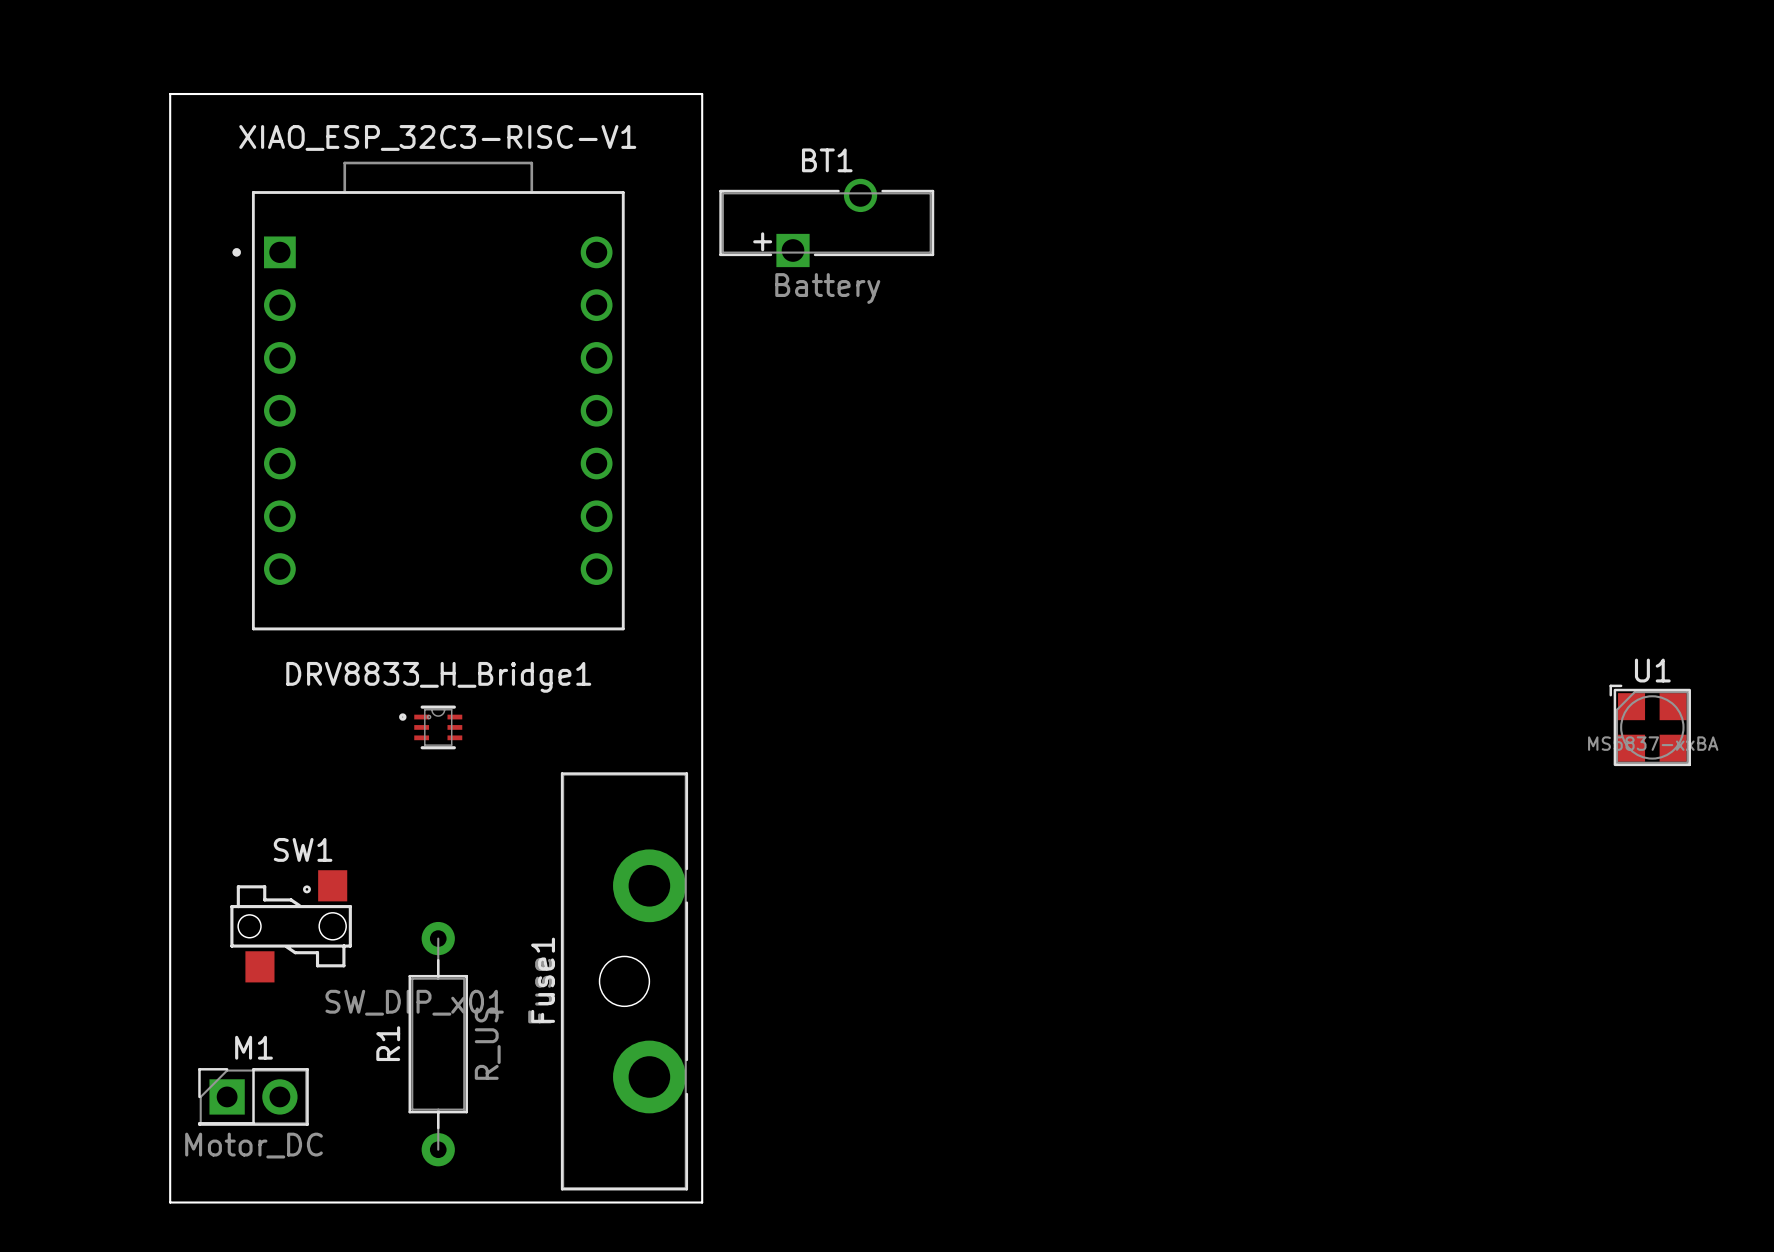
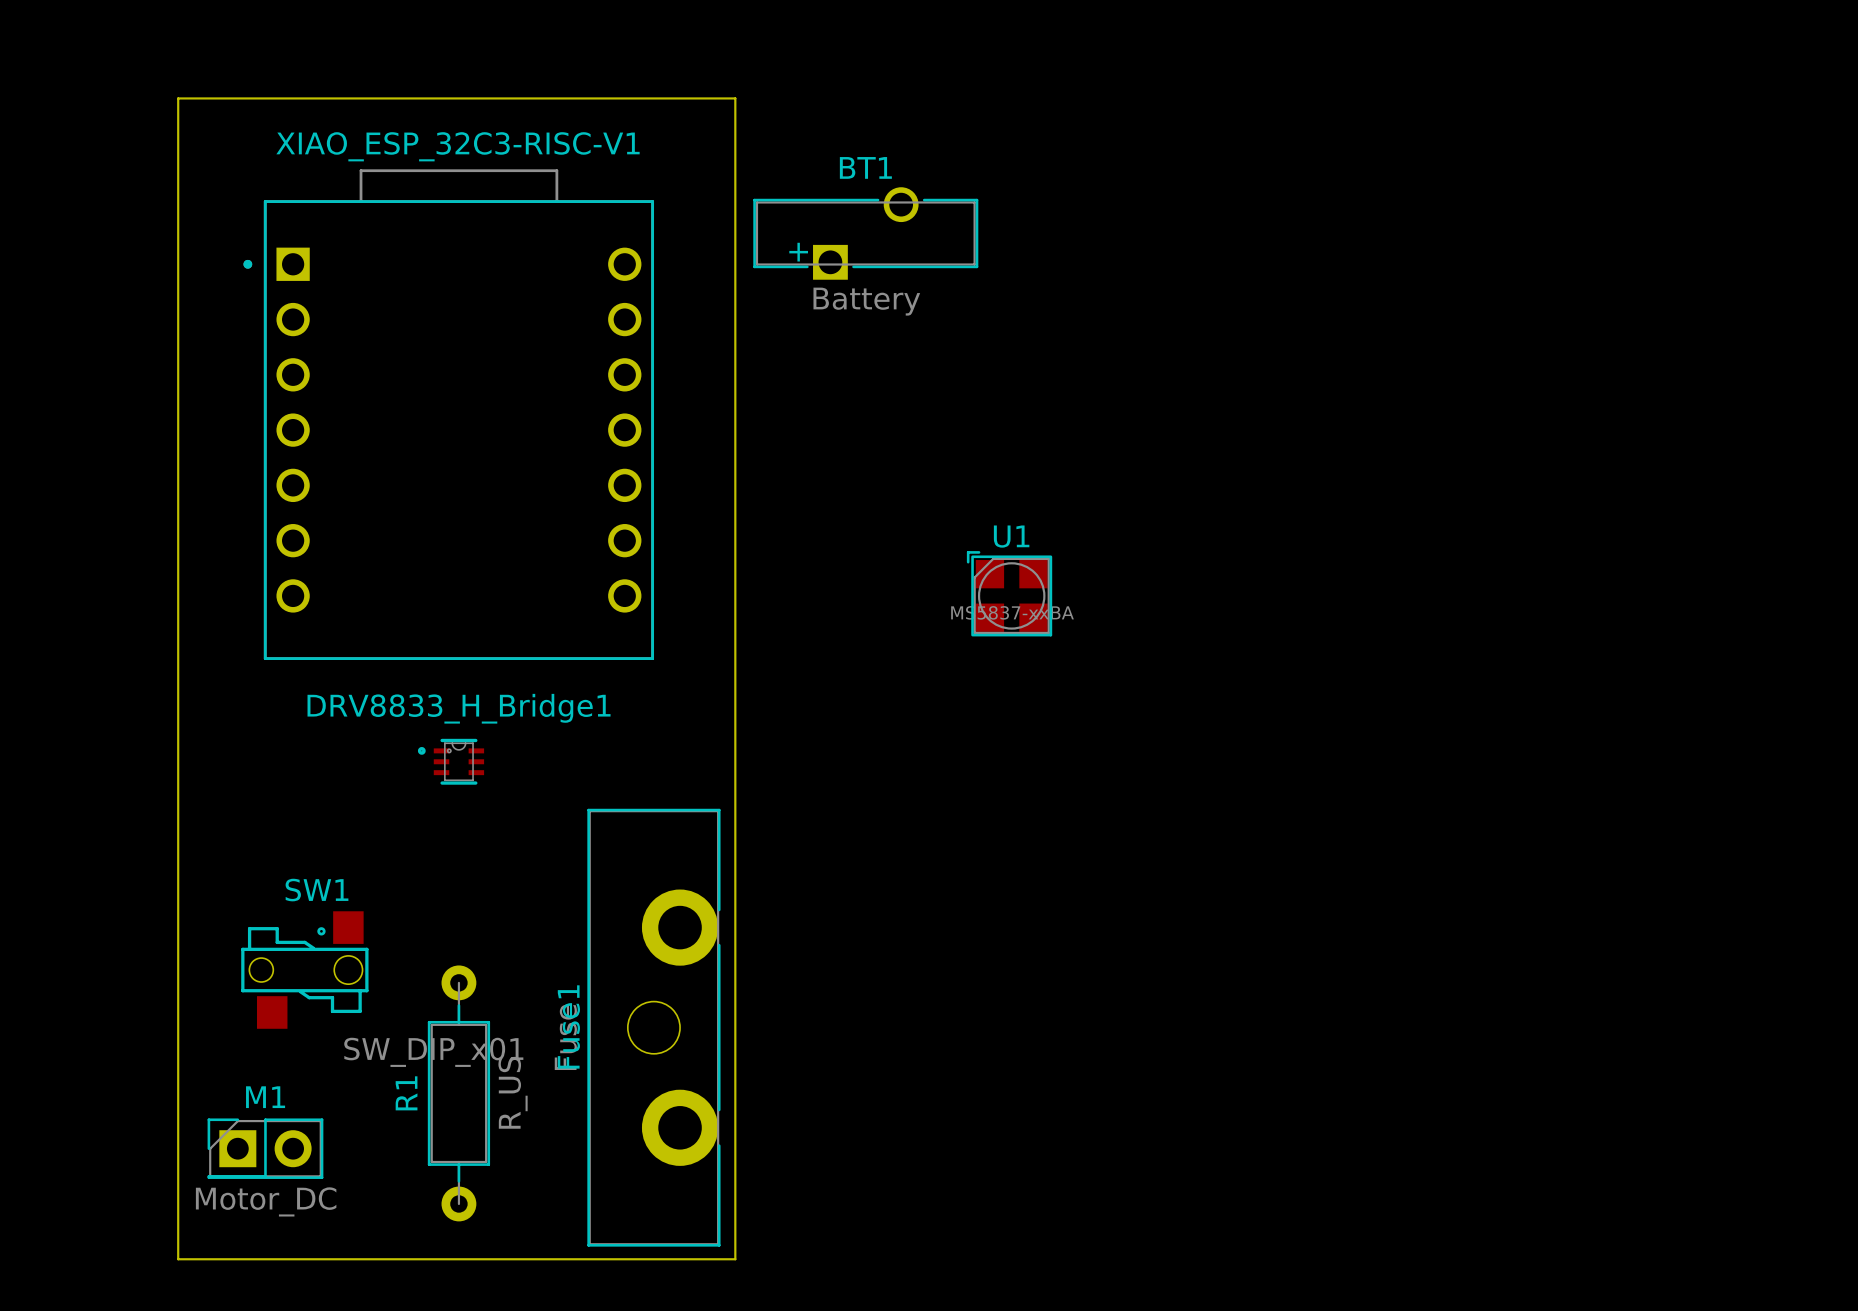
U1 position: (1650, 725) -> (1009, 593)

